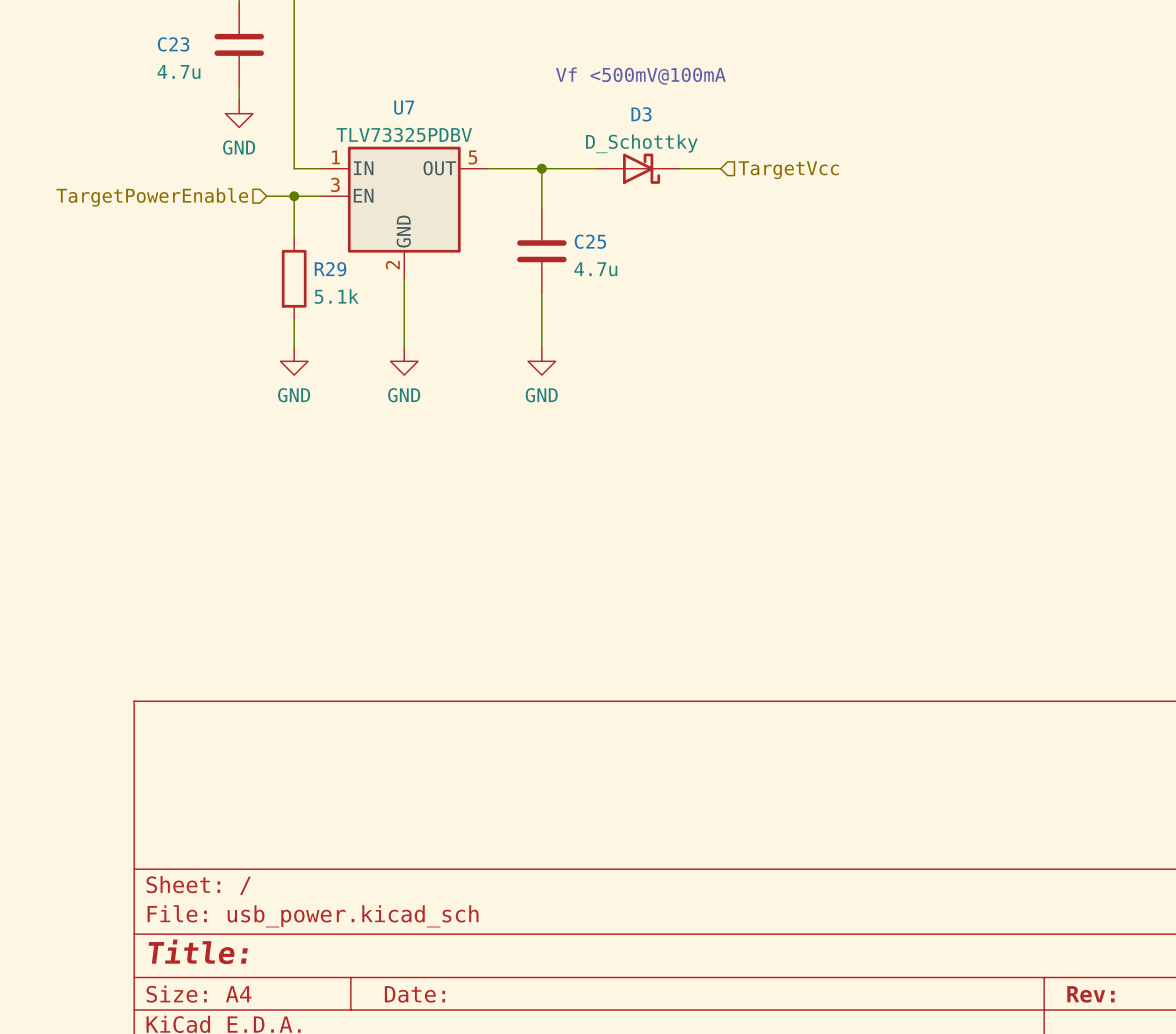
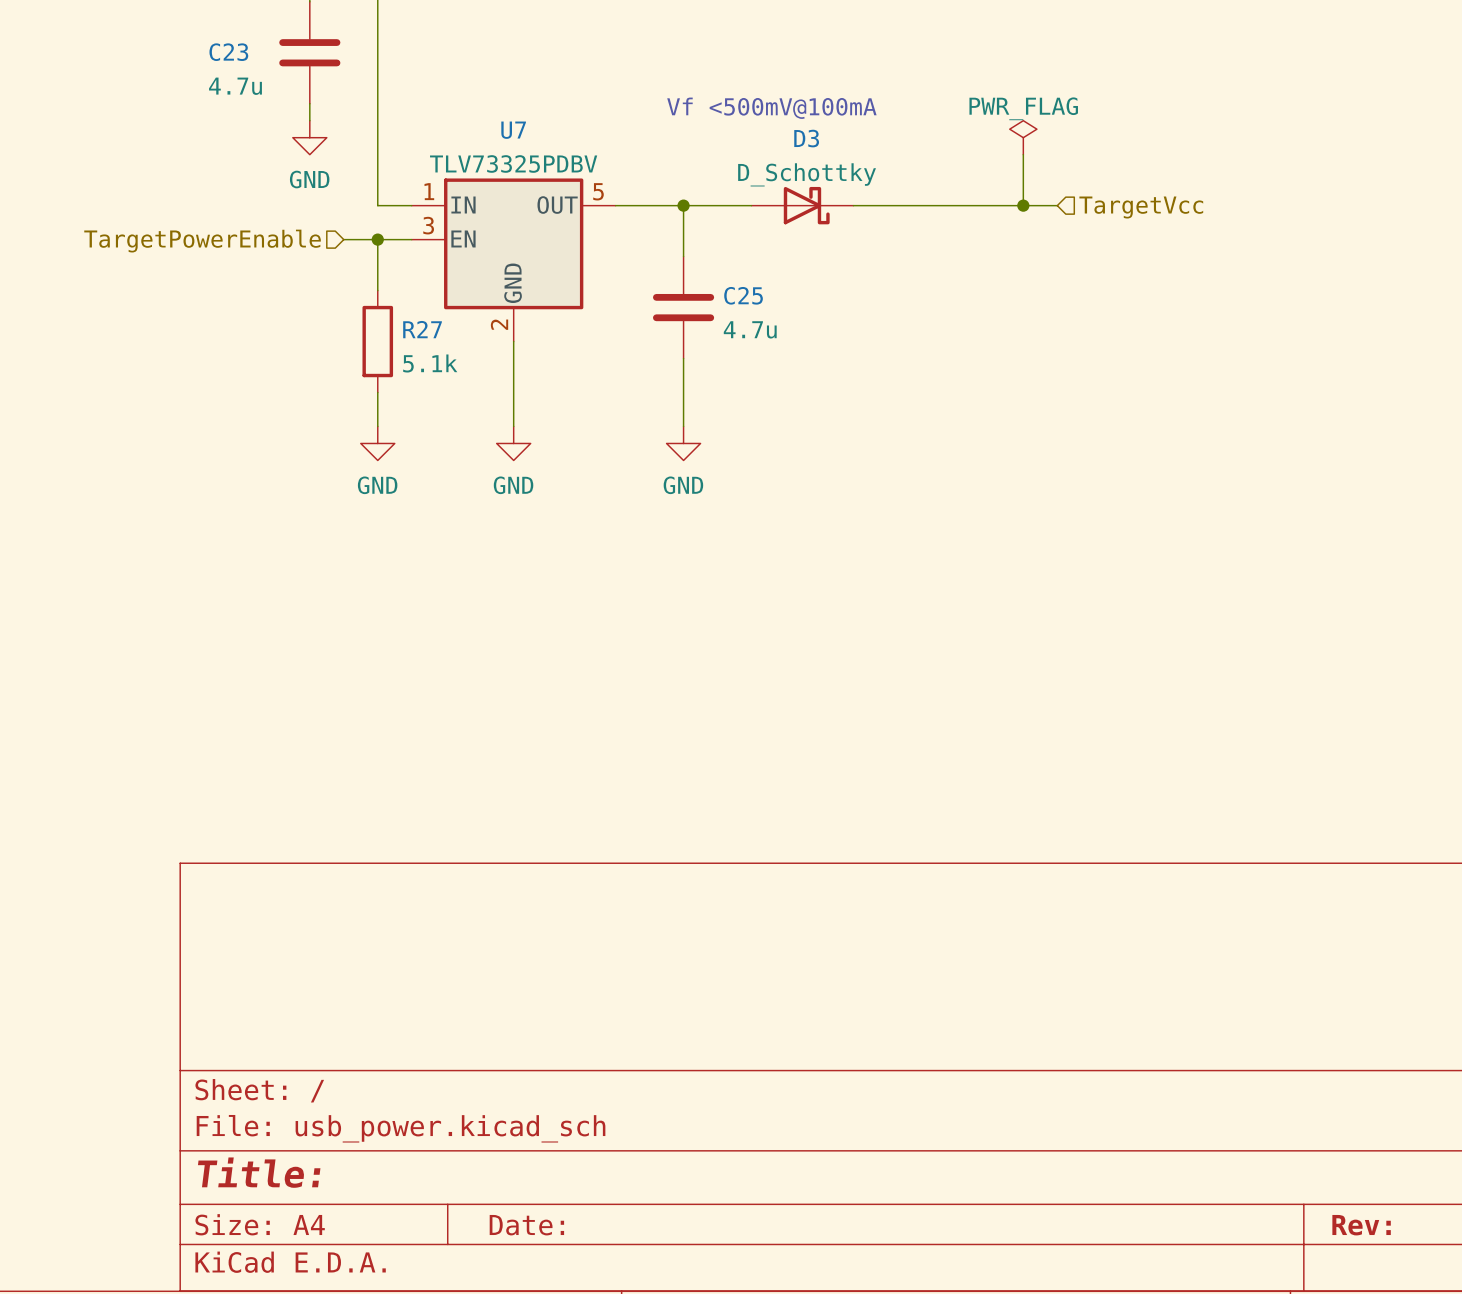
text position: Vf <500mV@100mA (640, 76) -> Vf <500mV@100mA (771, 108)
power symbol: none -> PWR_FLAG (1023, 137)
wire: none -> (1023, 154) (1023, 205)
wire: none -> (904, 205) (1057, 205)
junction: none -> (1023, 205)
hierarchical label position: TargetVcc (788, 170) -> TargetVcc (1141, 207)
R29 name: R29 (330, 269) -> R27 (422, 329)

